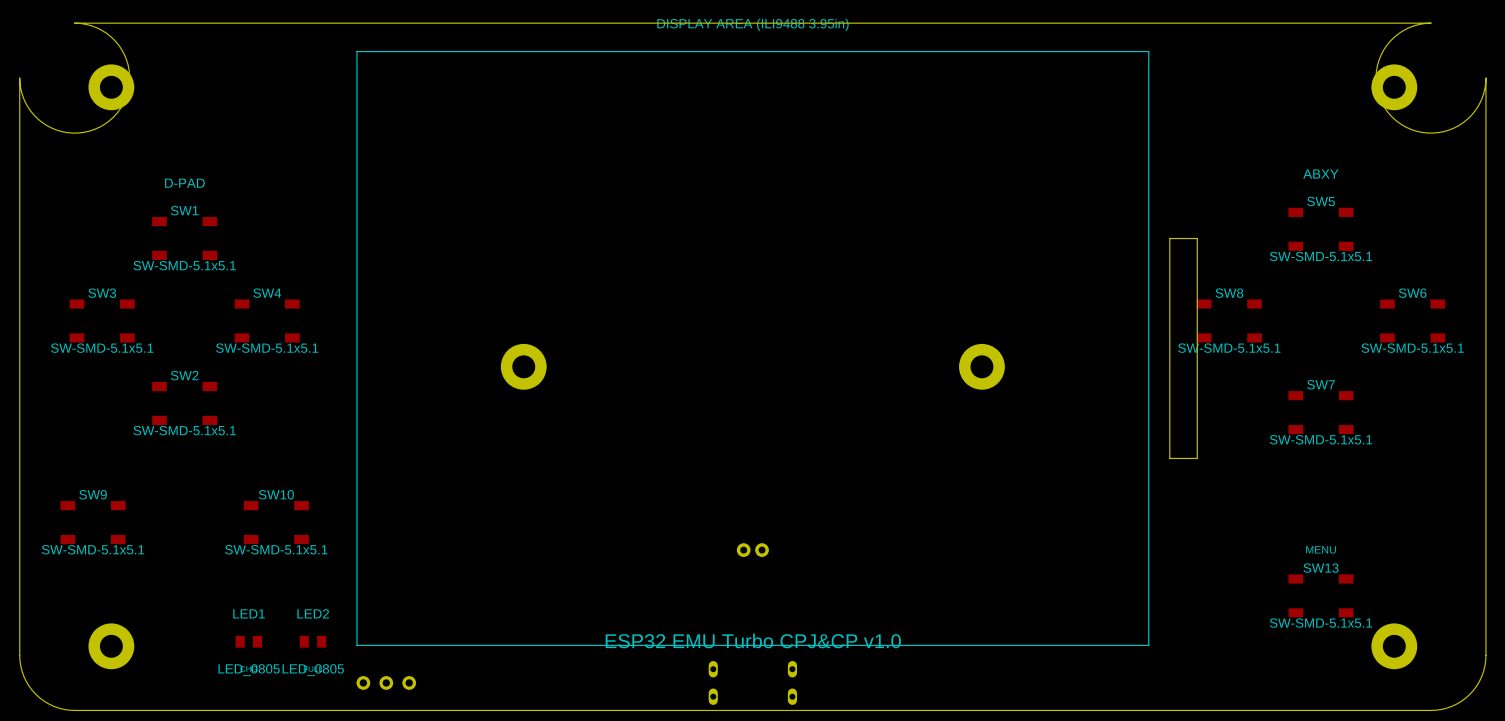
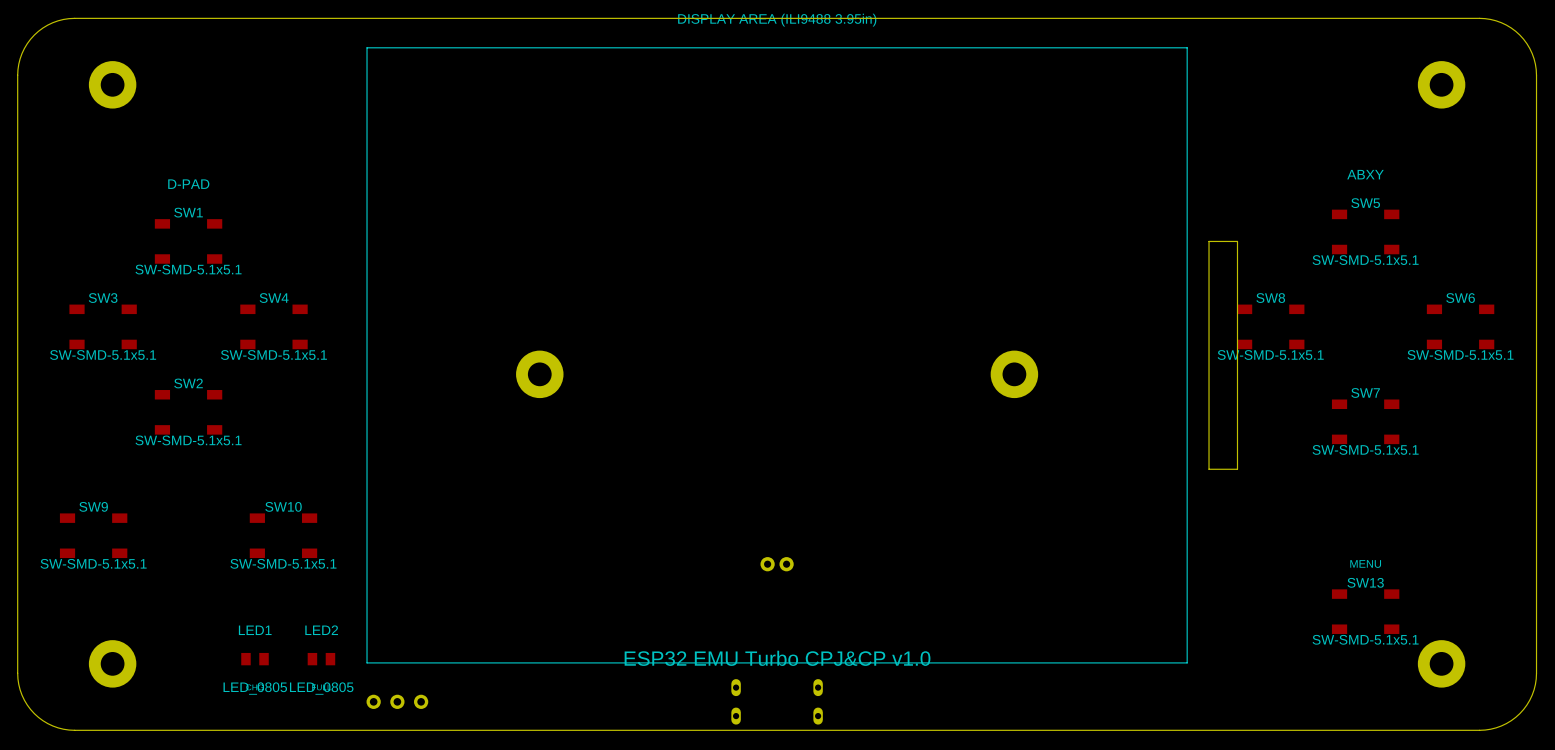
board edge: (74, 23) (91, 25) (106, 33) (118, 44) (126, 59) (129, 70) (128, 87) (123, 103) (113, 117) (100, 126) (84, 132) (67, 132) (56, 129) (41, 121) (29, 109) (22, 94) (19, 78) -> (74, 18) (52, 22) (34, 35) (22, 53) (17, 75)
board edge: (1430, 23) (1414, 25) (1399, 33) (1387, 44) (1379, 59) (1376, 76) (1378, 92) (1382, 103) (1392, 117) (1405, 126) (1421, 132) (1438, 132) (1454, 127) (1468, 118) (1475, 109) (1483, 94) (1485, 78) -> (1479, 18) (1501, 22) (1519, 35) (1532, 53) (1536, 75)

